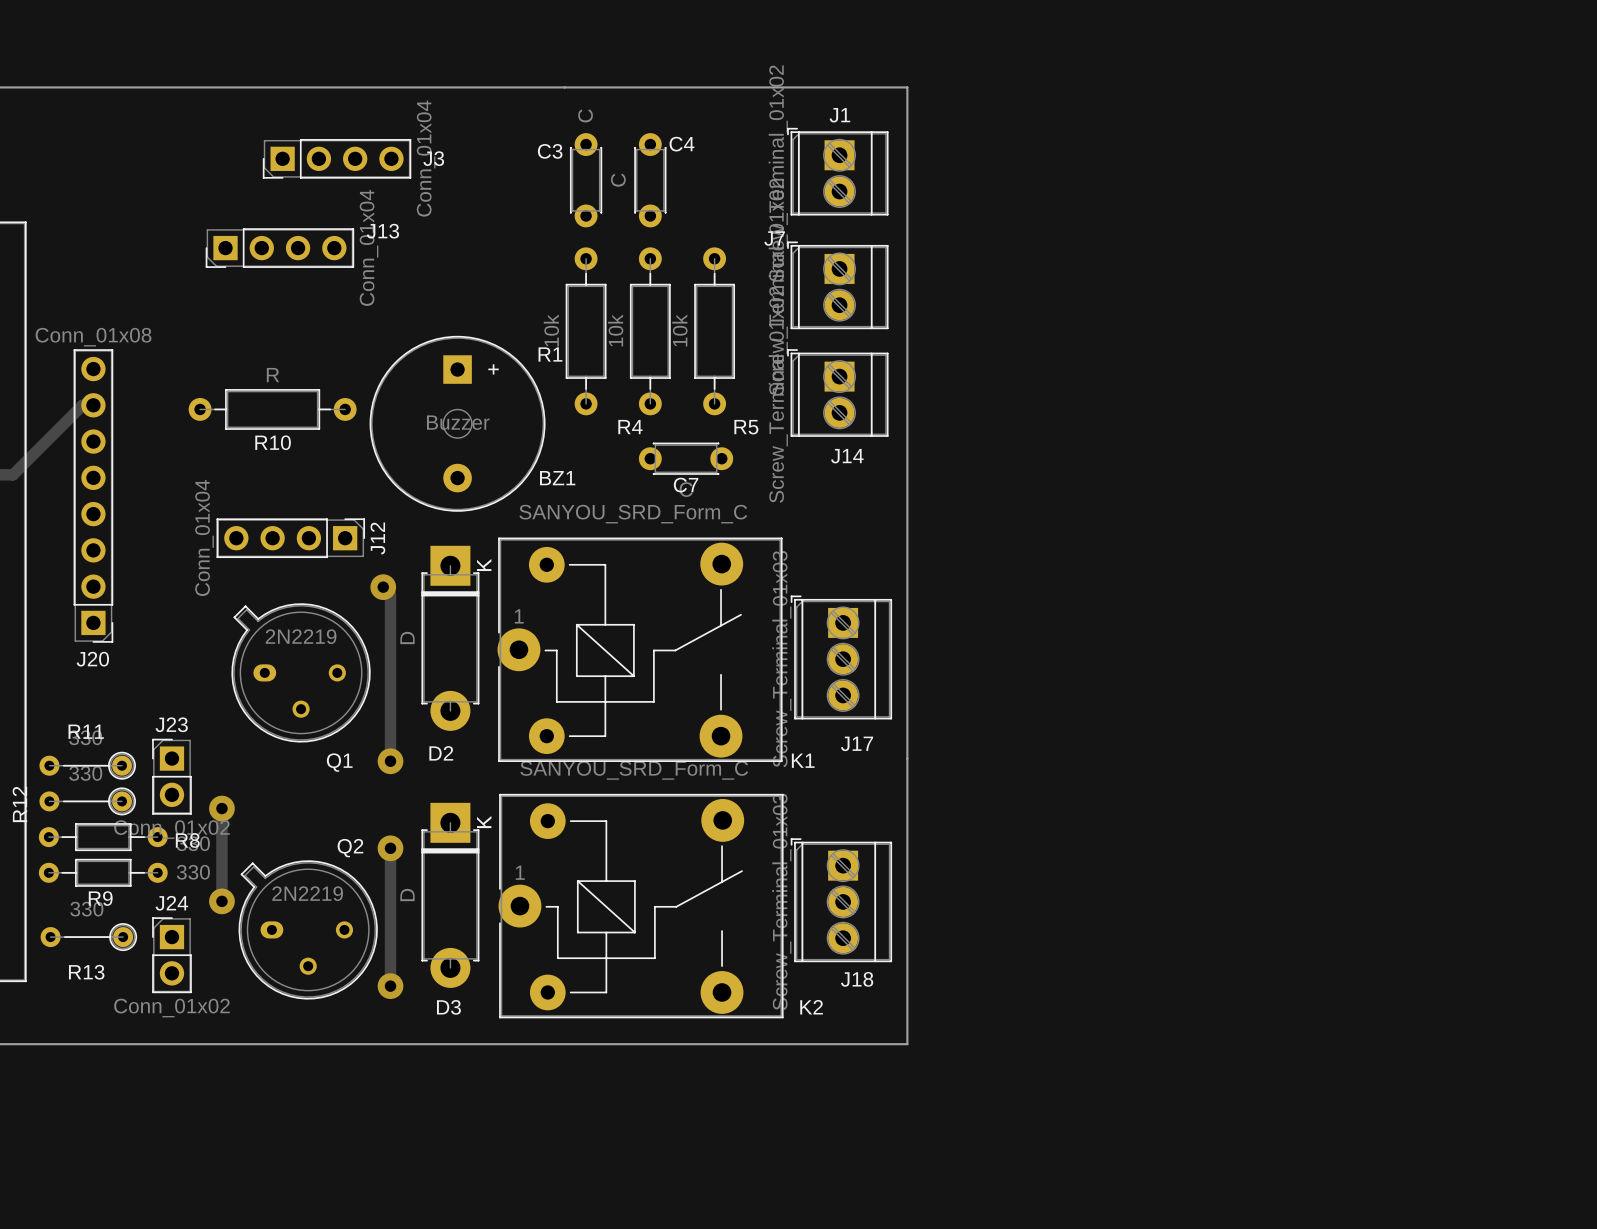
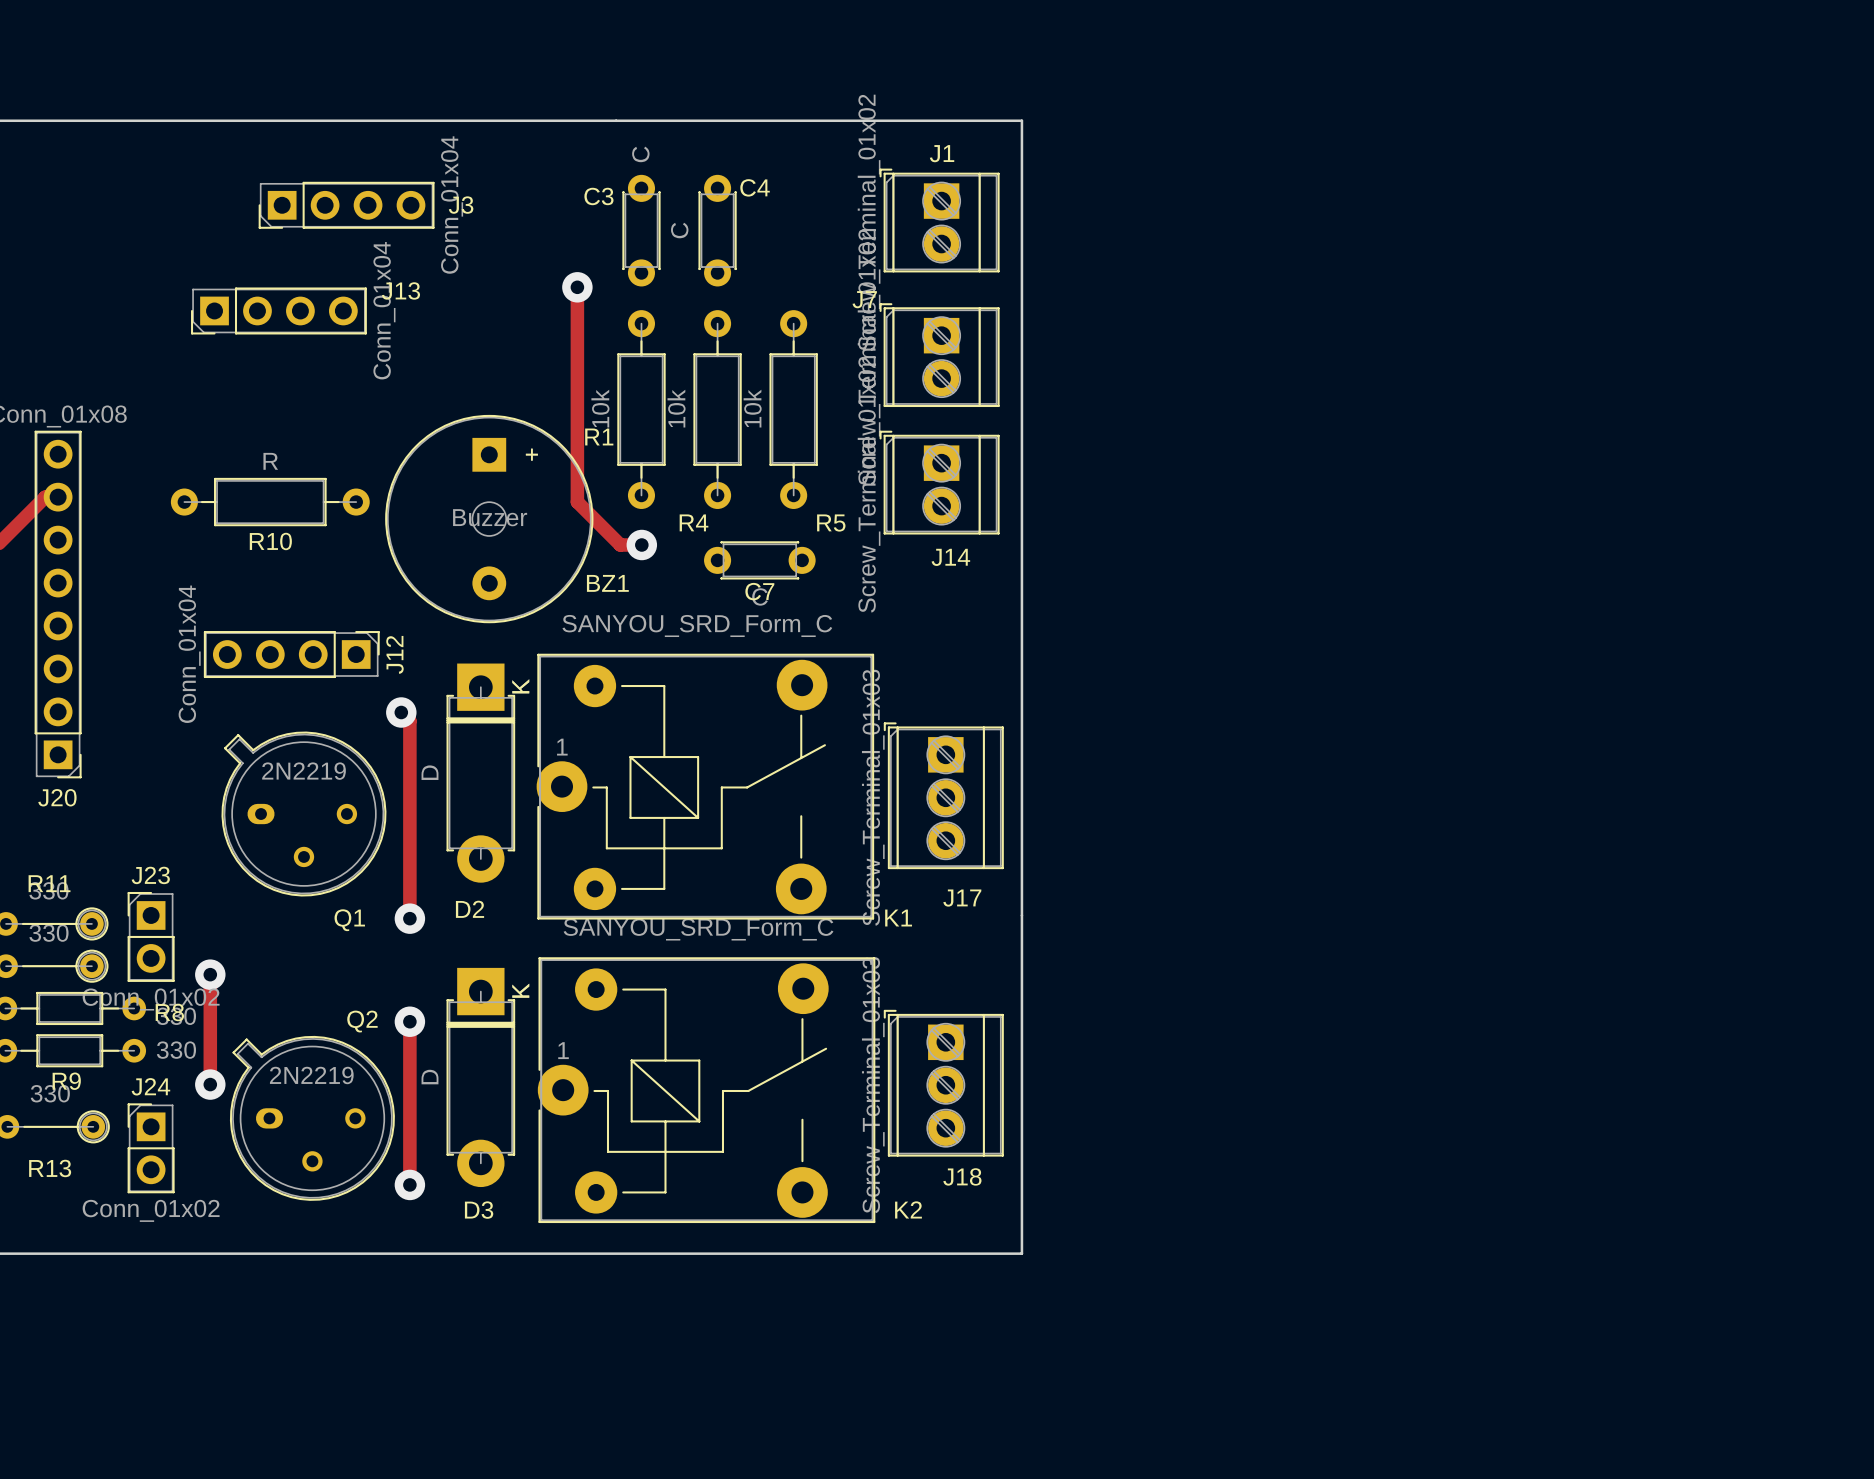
track: none -> (577, 287) (577, 502) (620, 545) (641, 545)
via: none -> (577, 287)
via: none -> (641, 545)

